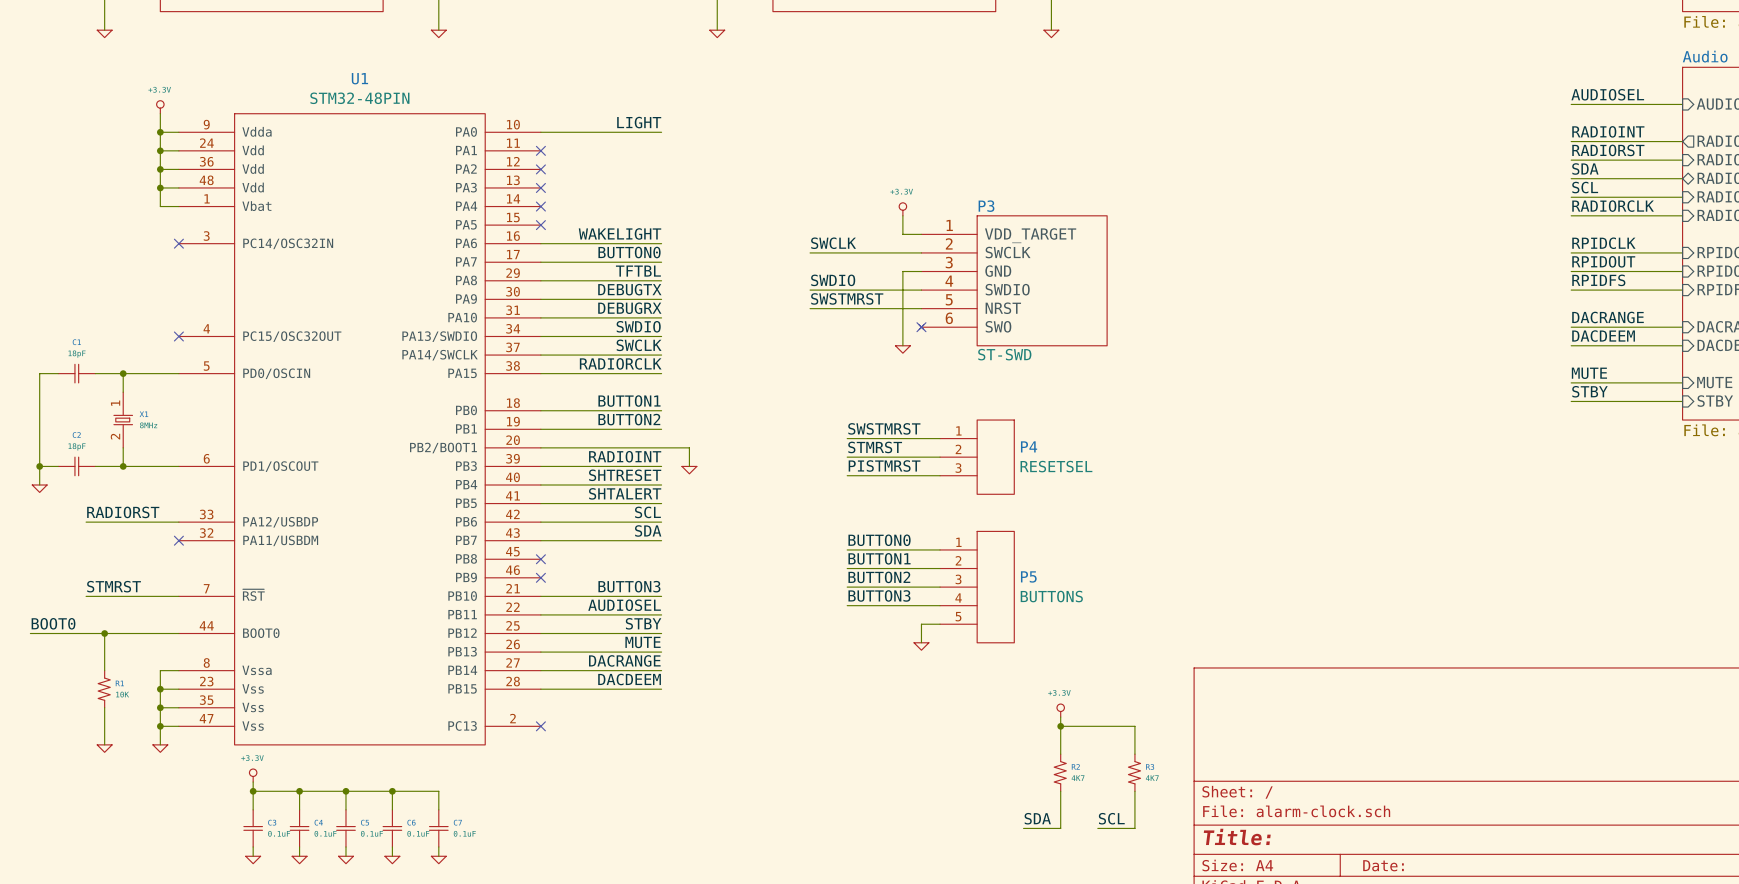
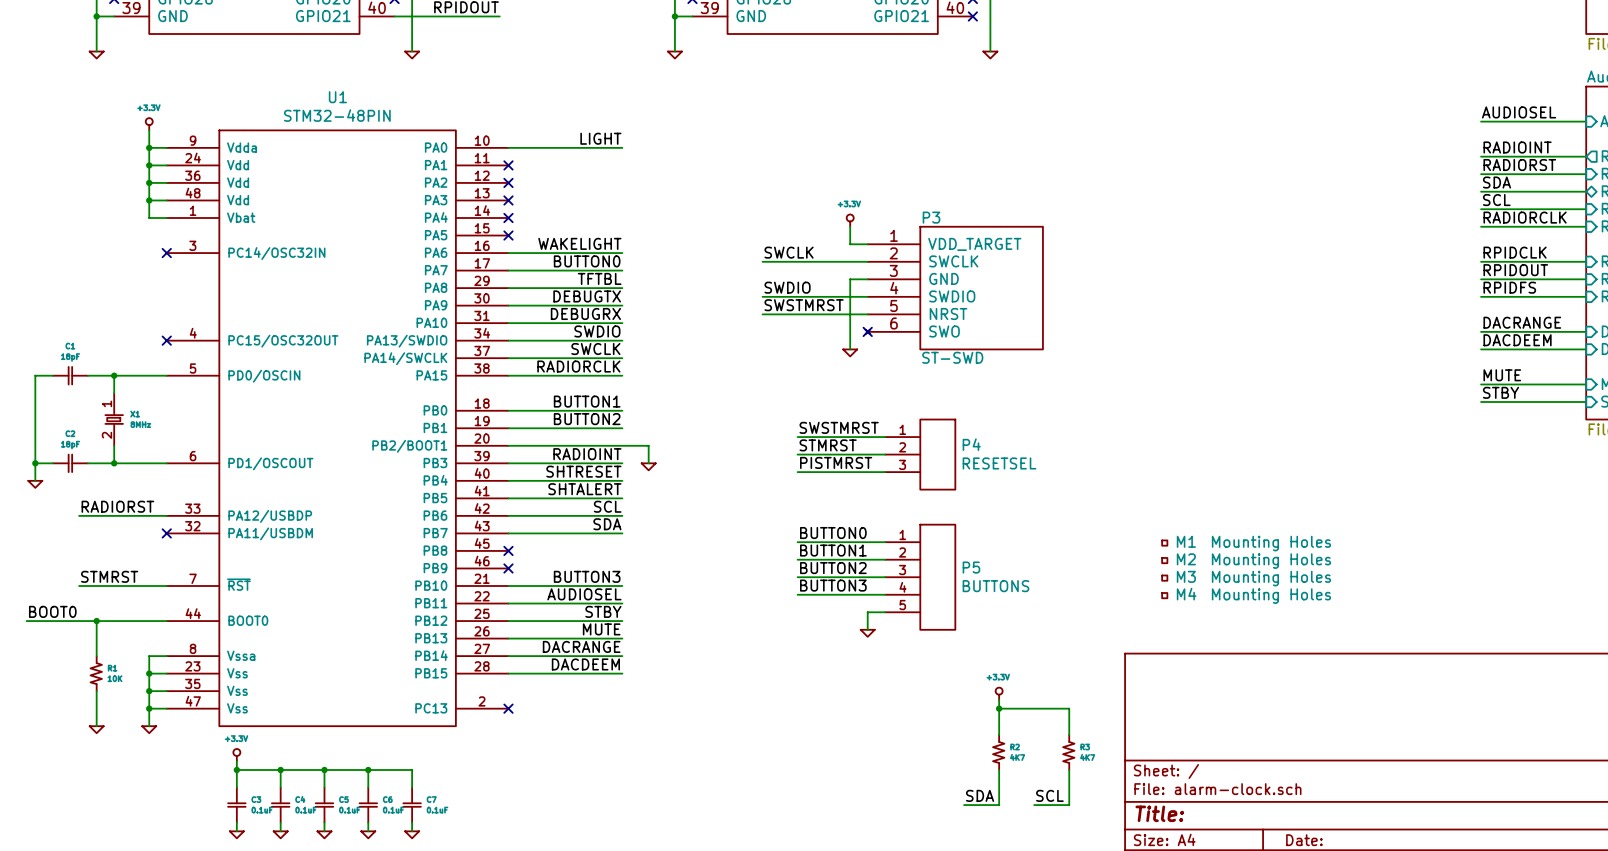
M1: none -> Mounting Holes (1164, 543)
M2: none -> Mounting Holes (1164, 560)
M3: none -> Mounting Holes (1164, 578)
M4: none -> Mounting Holes (1164, 595)

